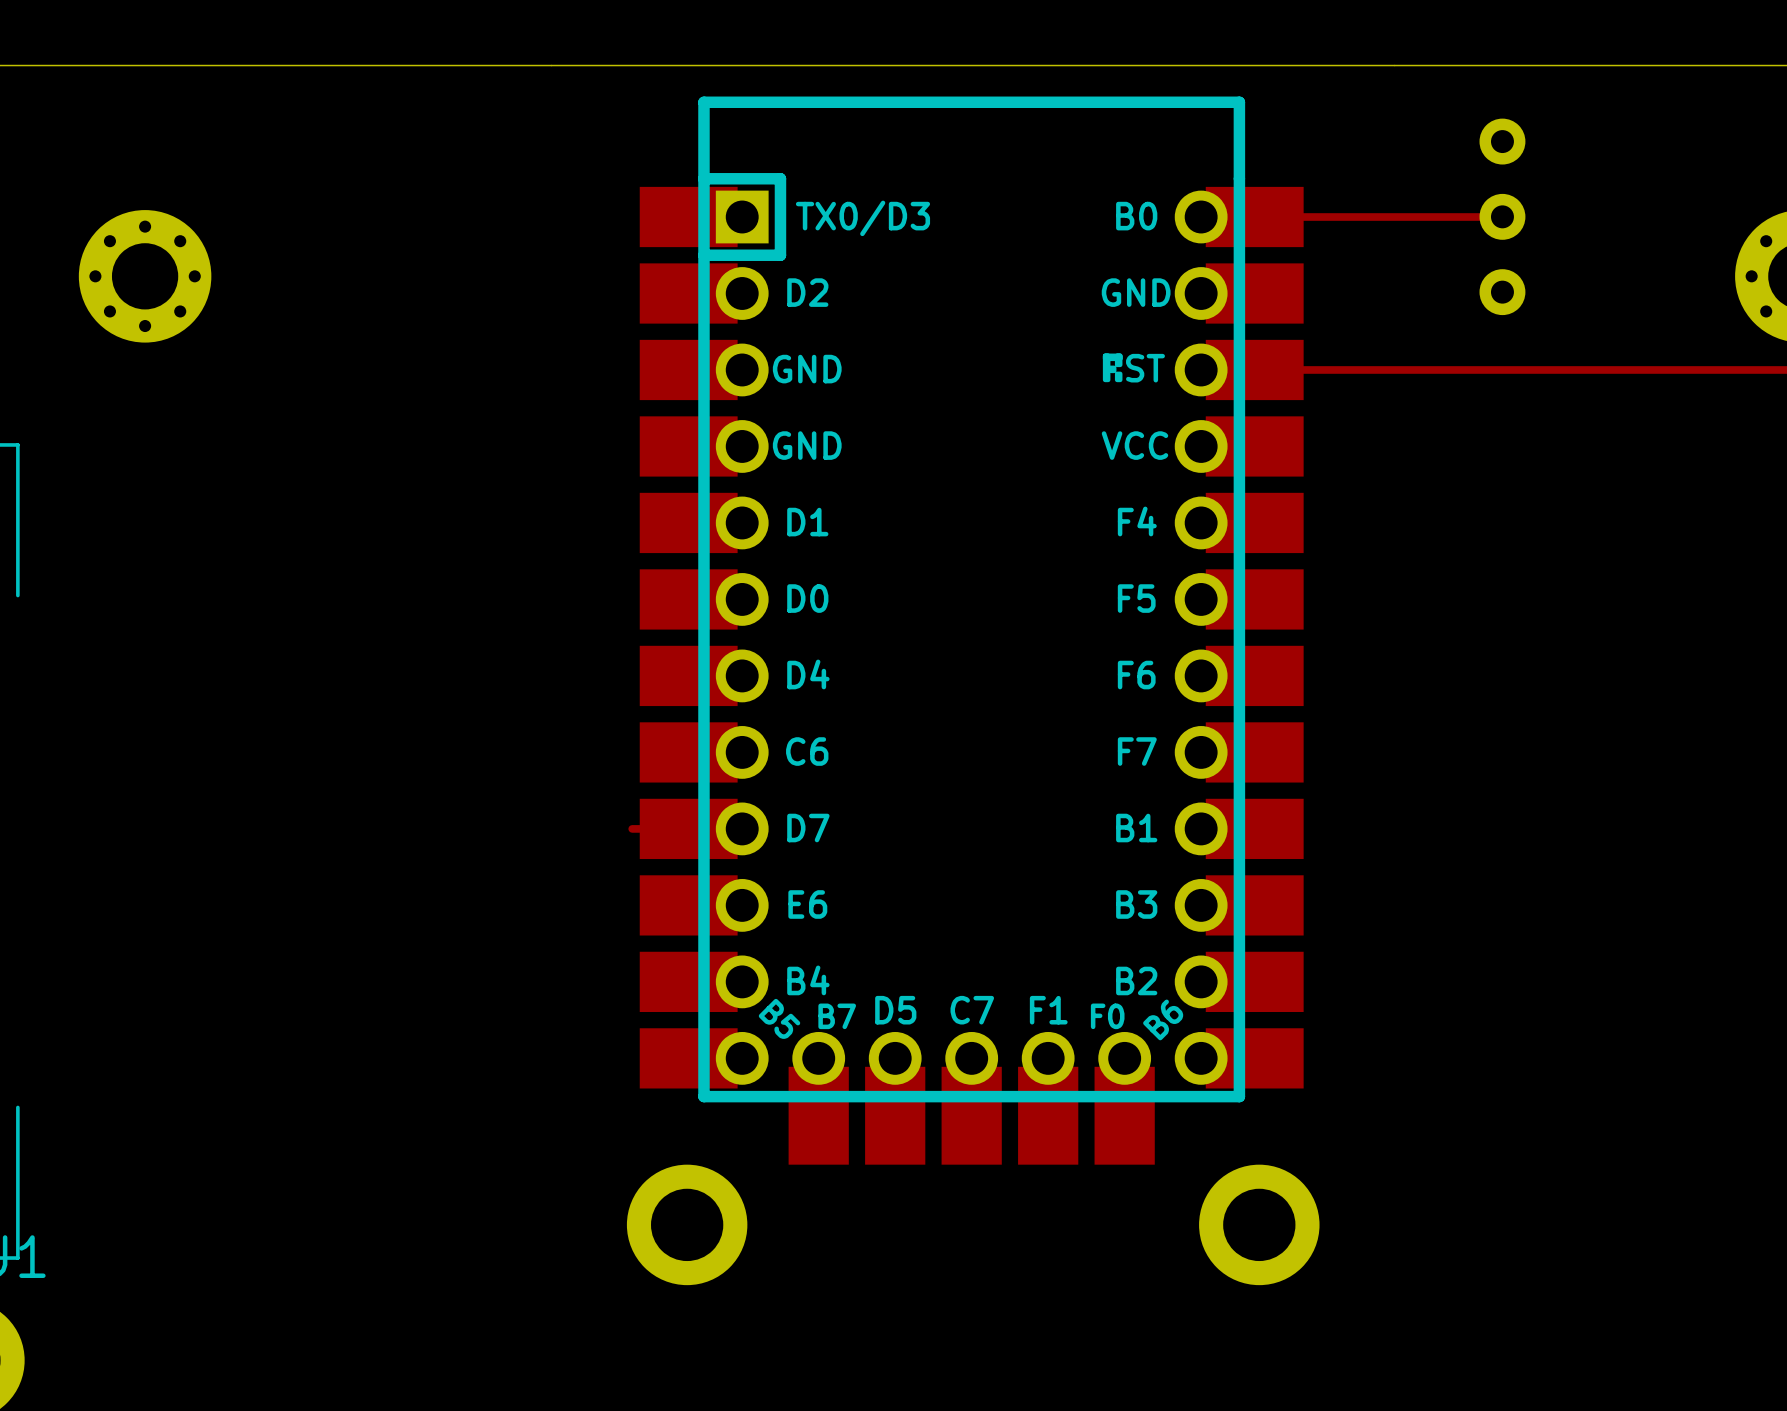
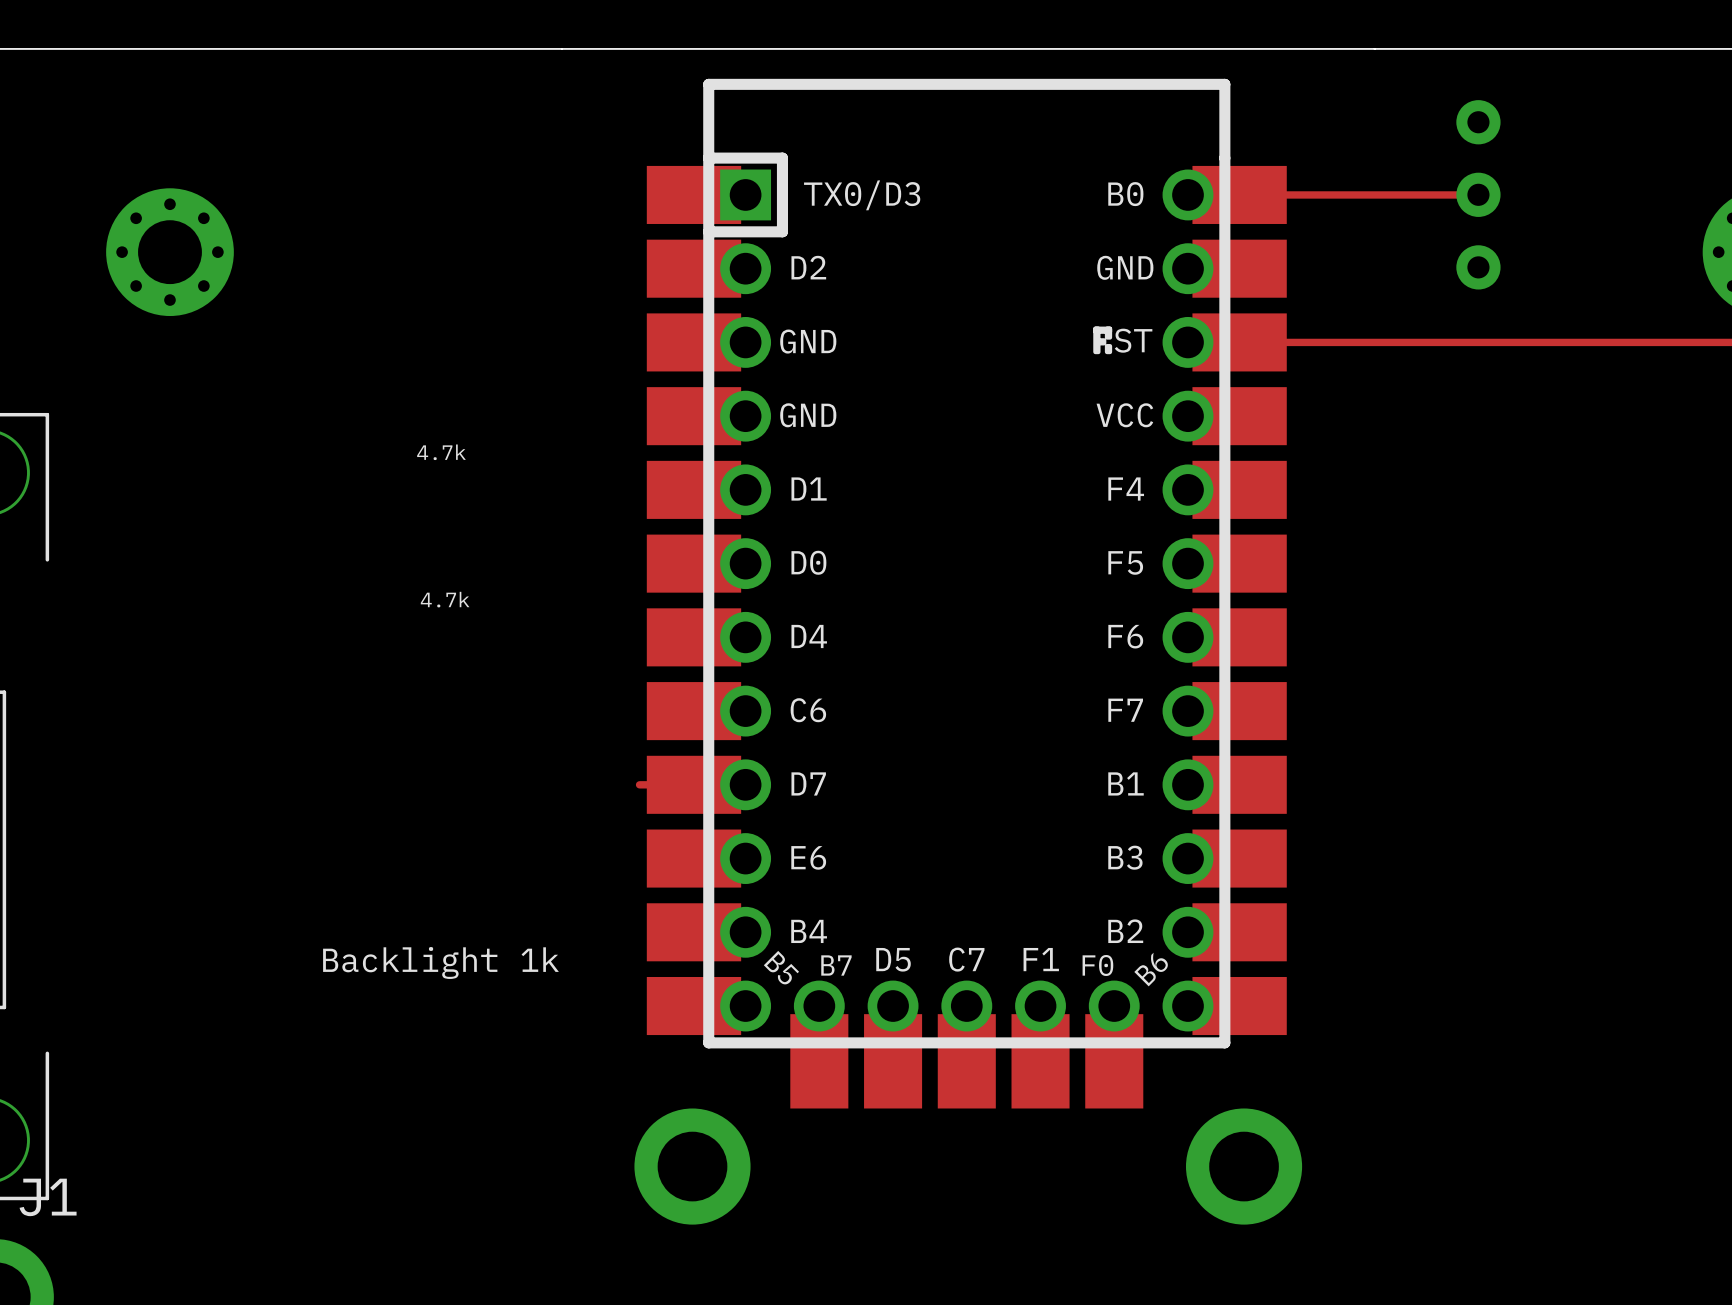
text: none -> 4.7k (441, 452)
text: none -> 4.7k (445, 599)
text: none -> Backlight 1k (440, 963)

